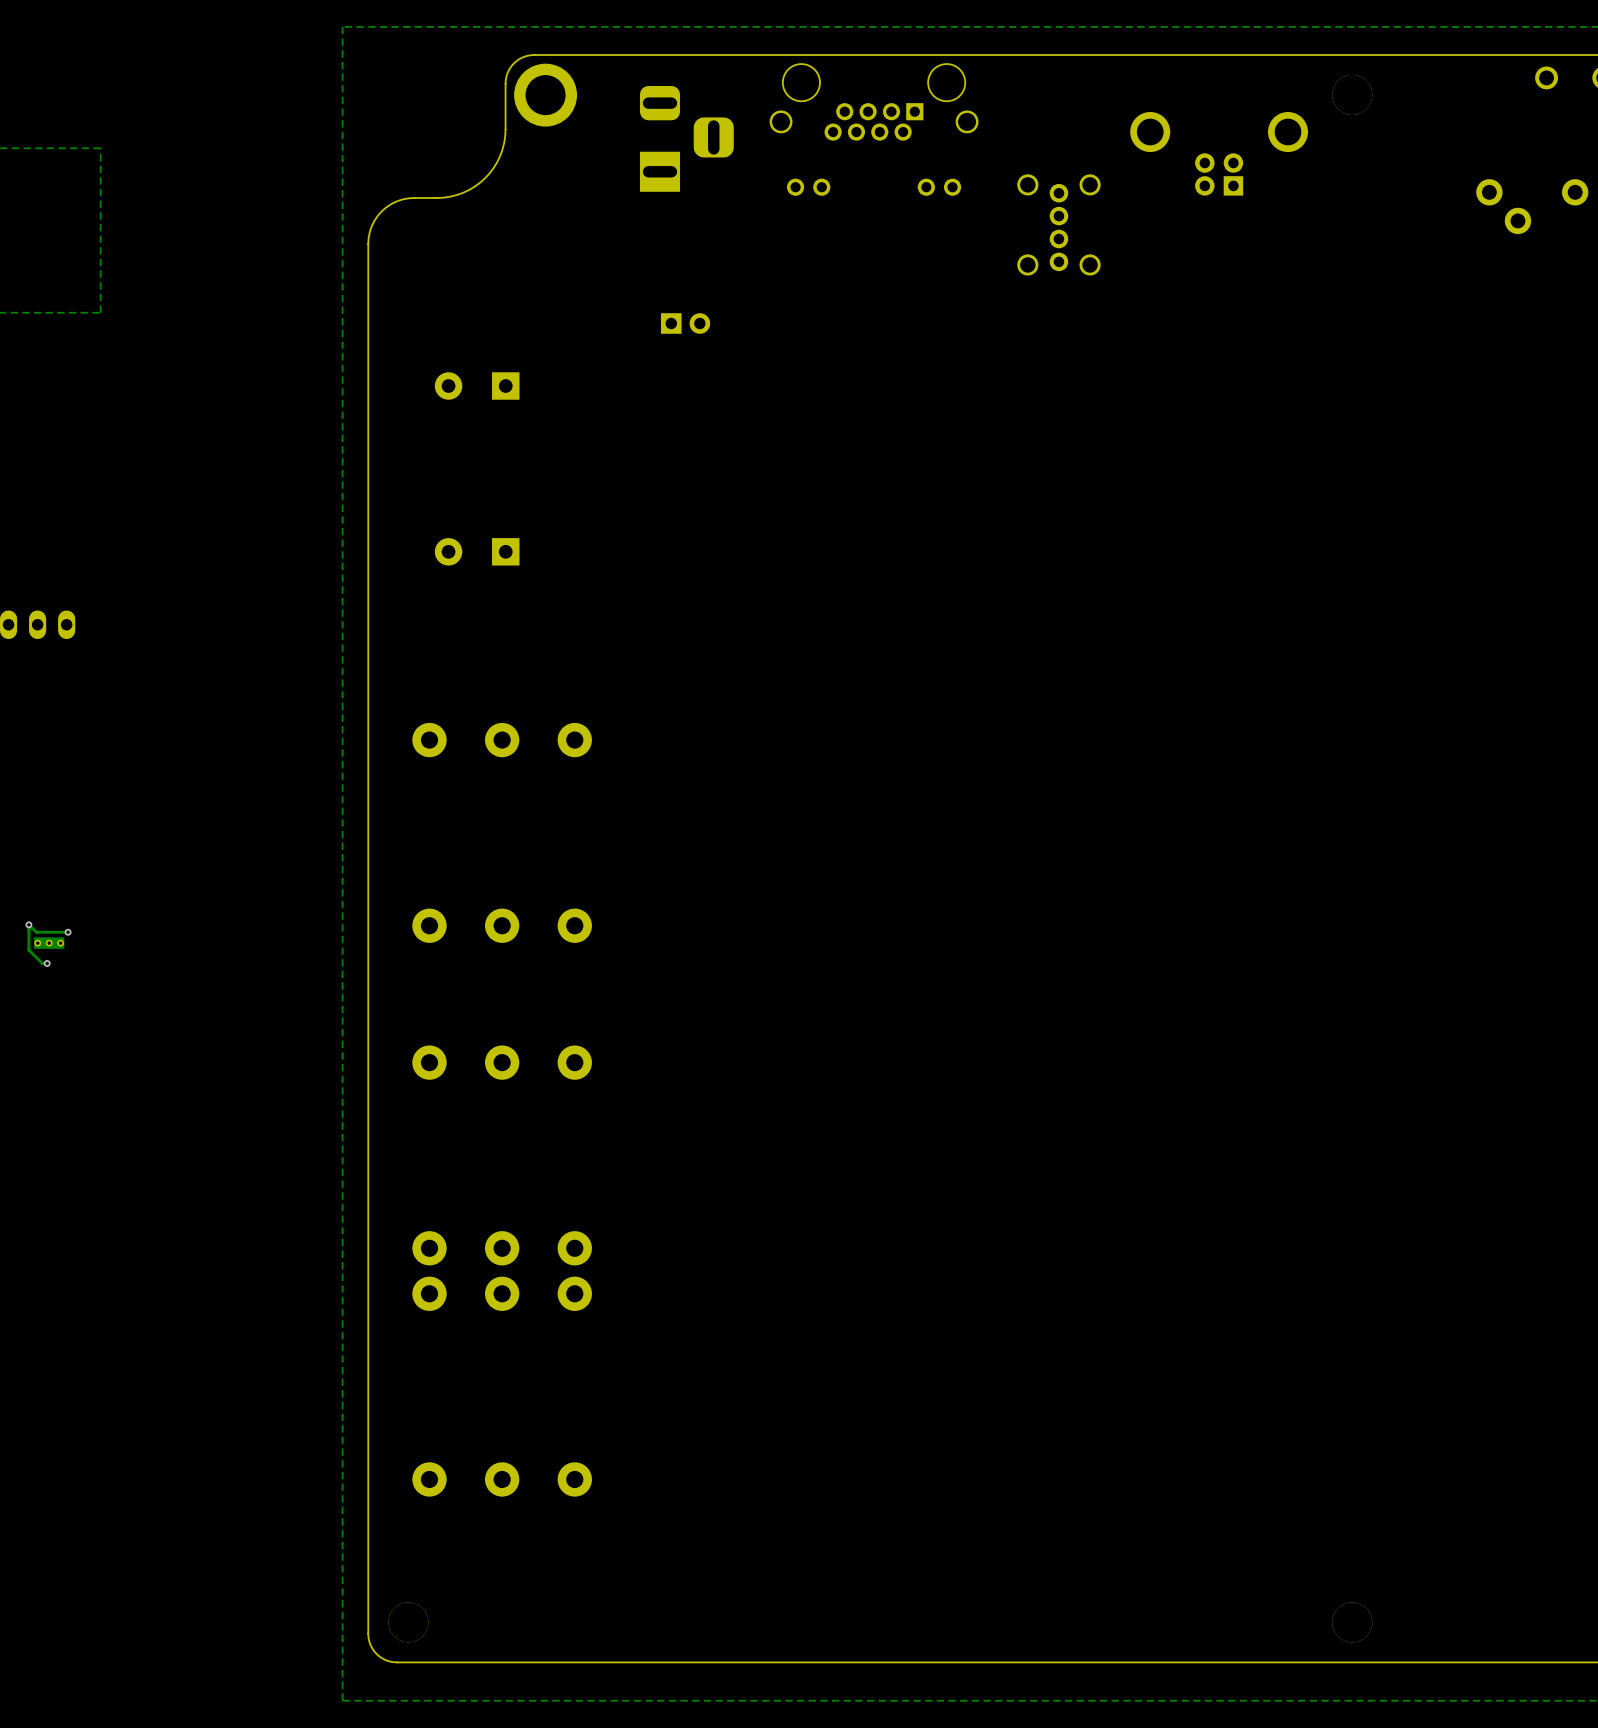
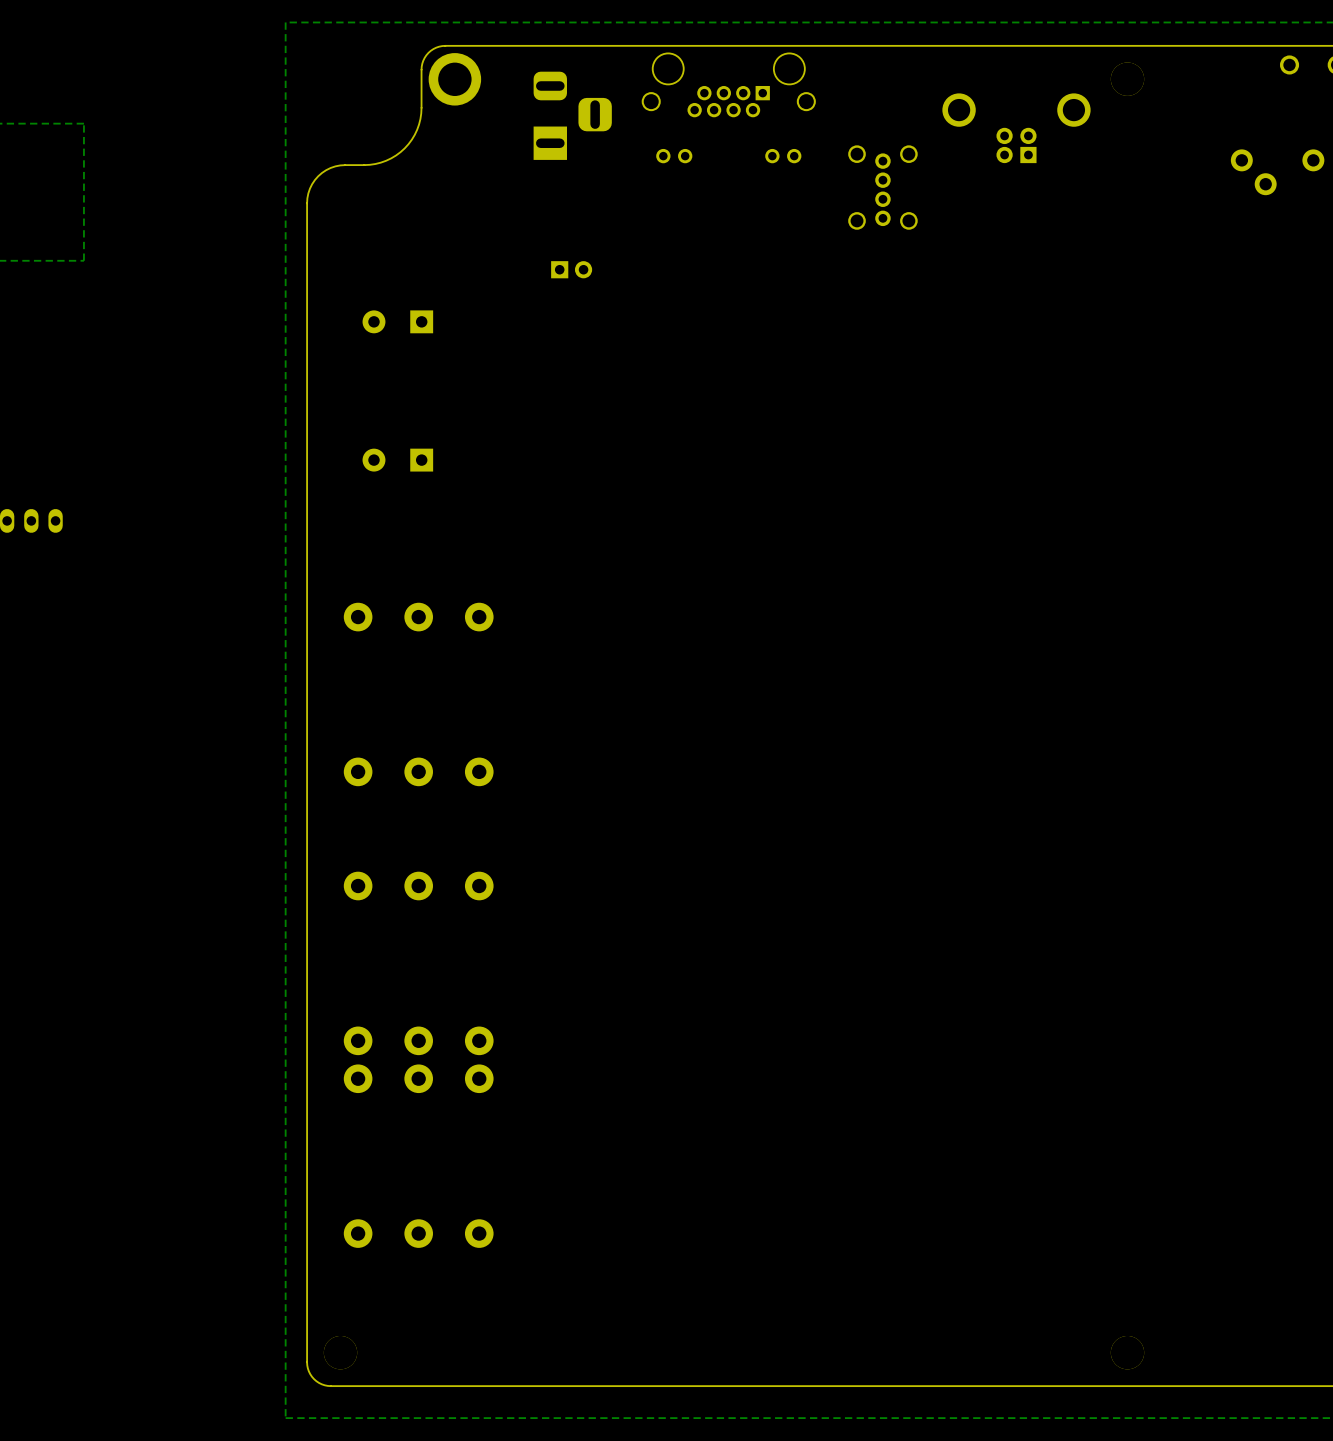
via: (28, 924) -> none
track: (68, 932) (36, 932) (28, 924) (28, 950) (42, 963) (47, 963) -> none
via: (68, 932) -> none
part: (49, 943) -> none
via: (47, 963) -> none

